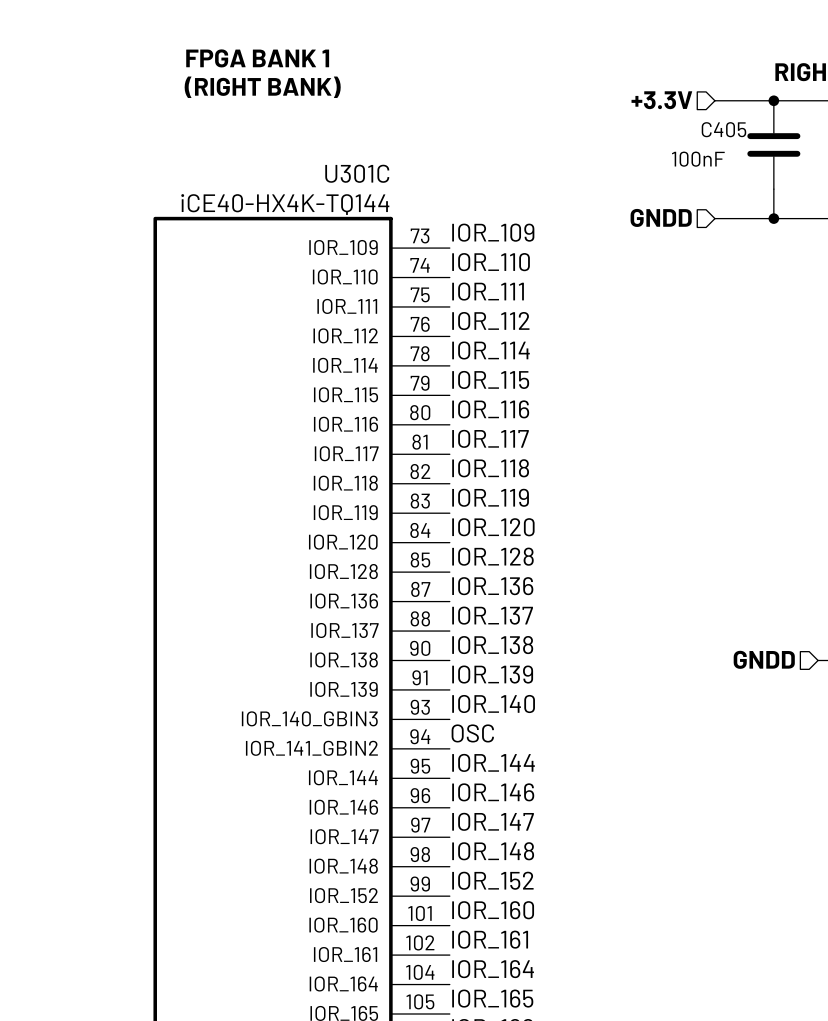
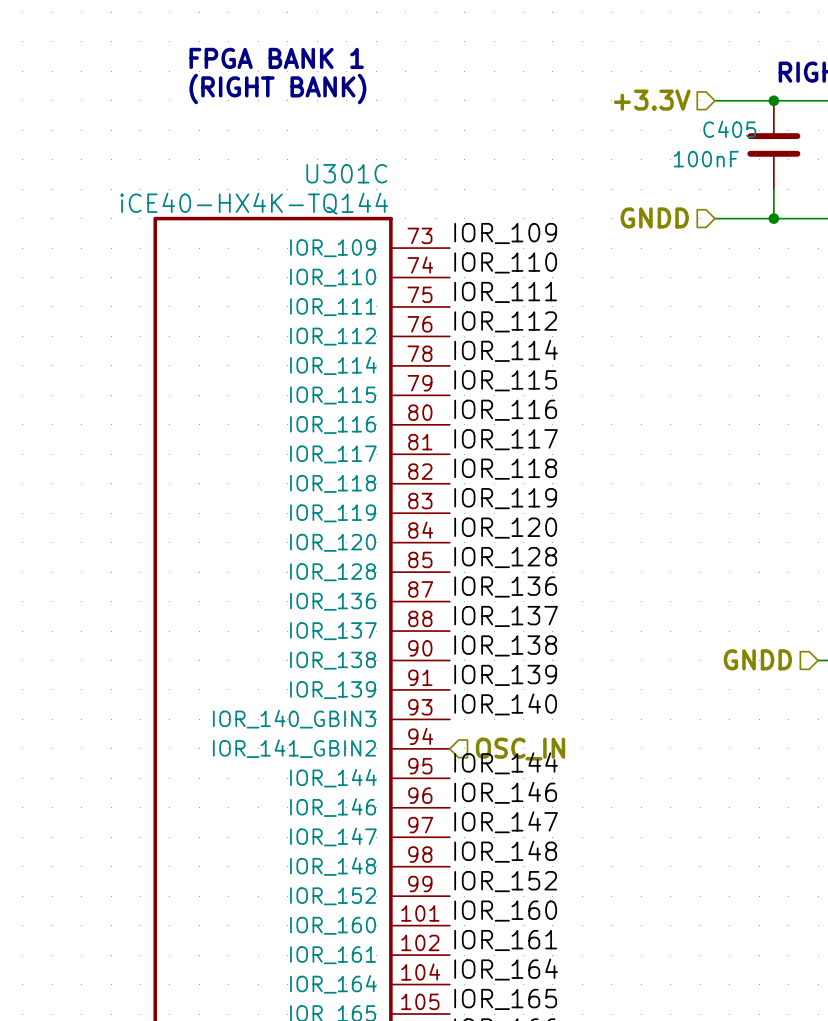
label: OSC (472, 733) -> none
hierarchical label: none -> OSC_IN (520, 749)

